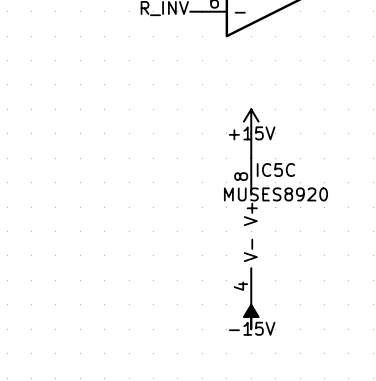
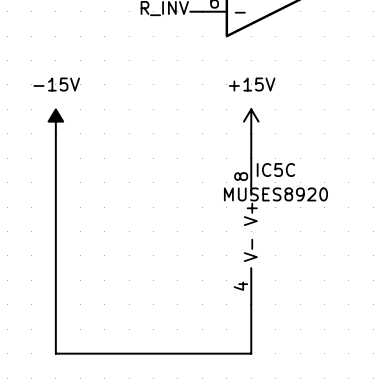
power symbol: none -> -15V (55, 121)
wire: none -> (55, 133) (55, 353) (251, 353) (251, 329)
power symbol text position: +15V (252, 133) -> +15V (252, 84)
power symbol: -15V (251, 317) -> none

